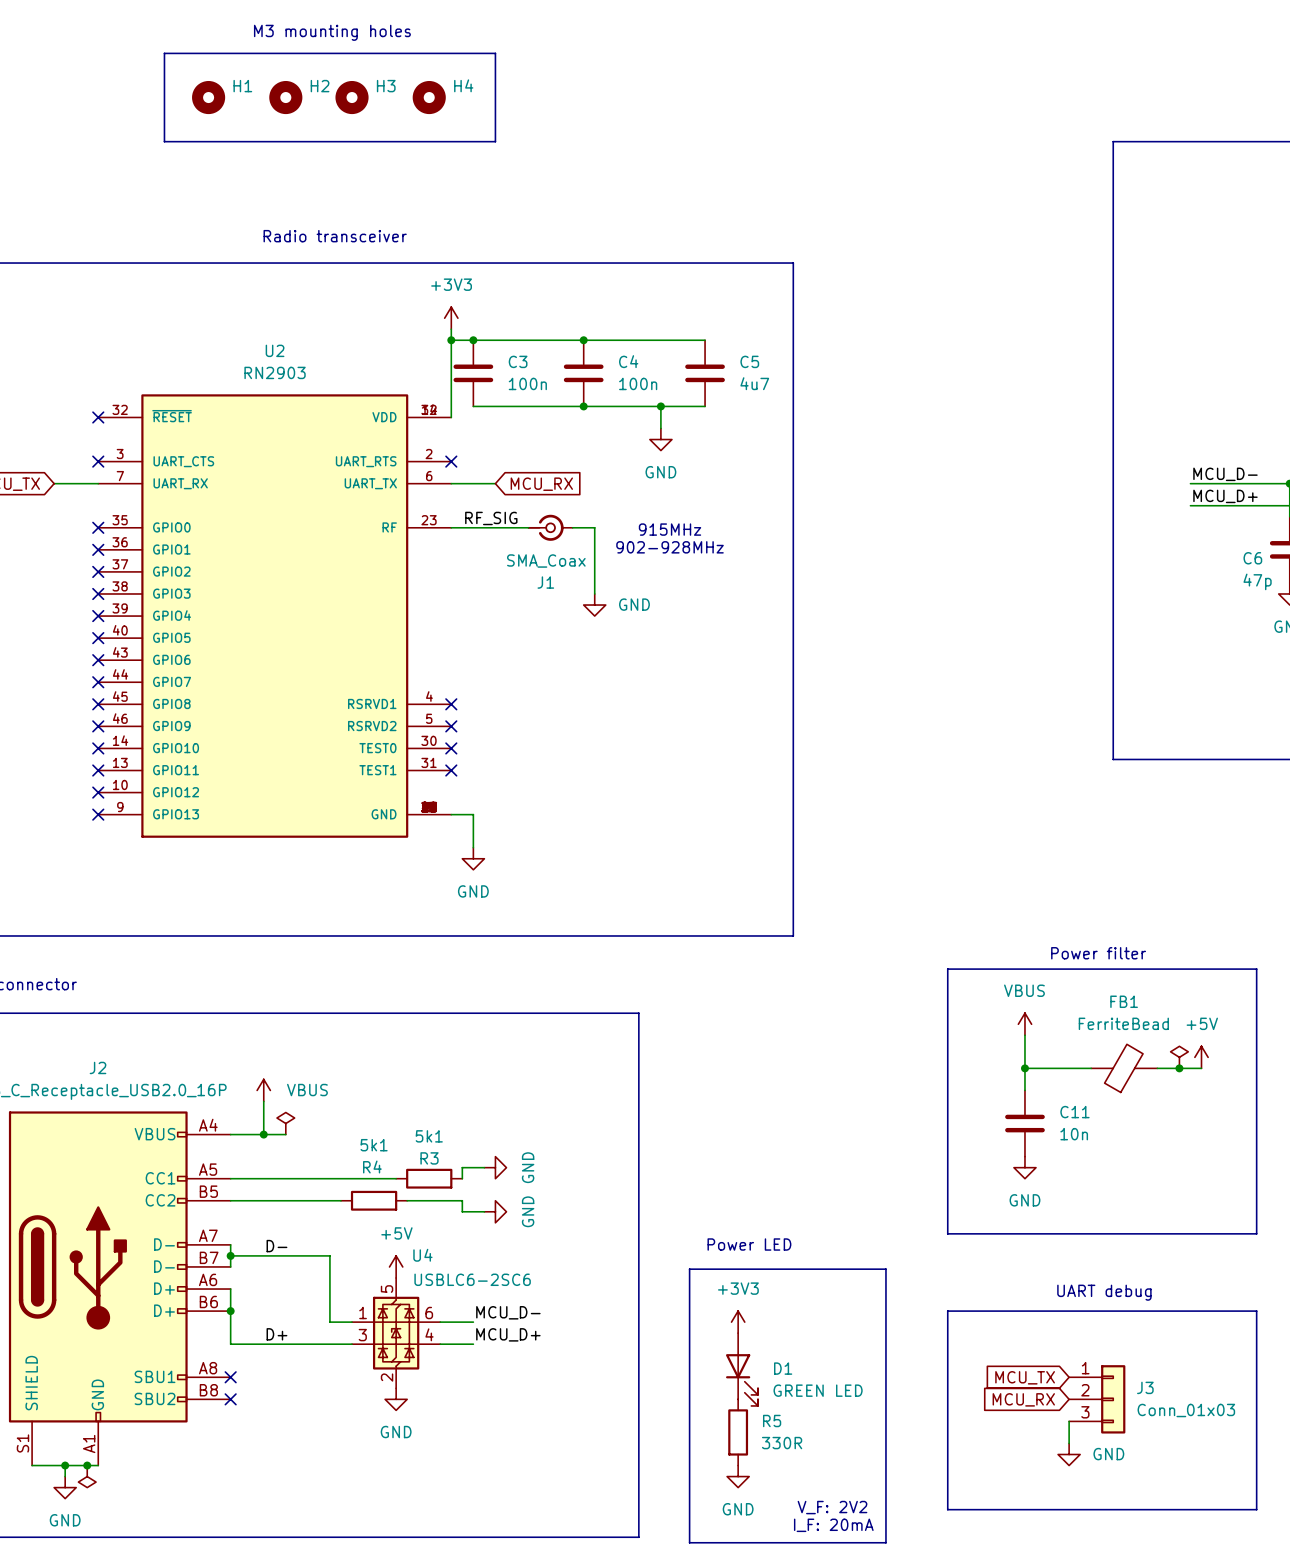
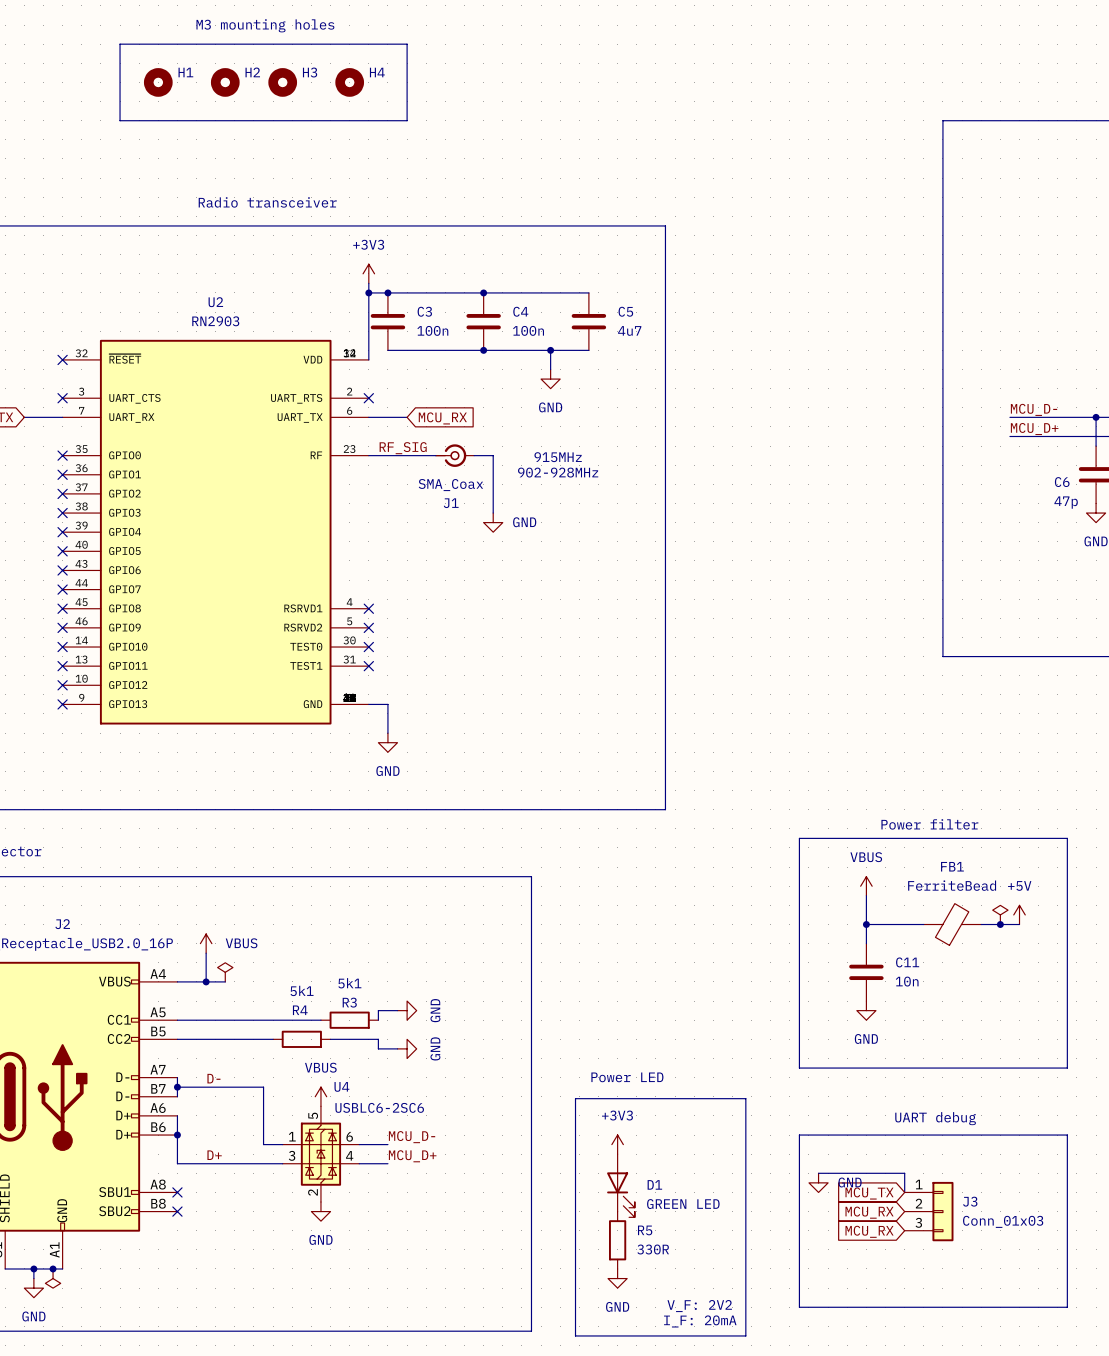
power symbol: +5V (396, 1266) -> VBUS (320, 1096)
wire: none -> (818, 1173) (904, 1173) (904, 1192)
global label: none -> MCU_RX (869, 1231)
wire: (1069, 1421) (1069, 1443) -> none
power symbol position: GND (1069, 1454) -> GND (818, 1182)

